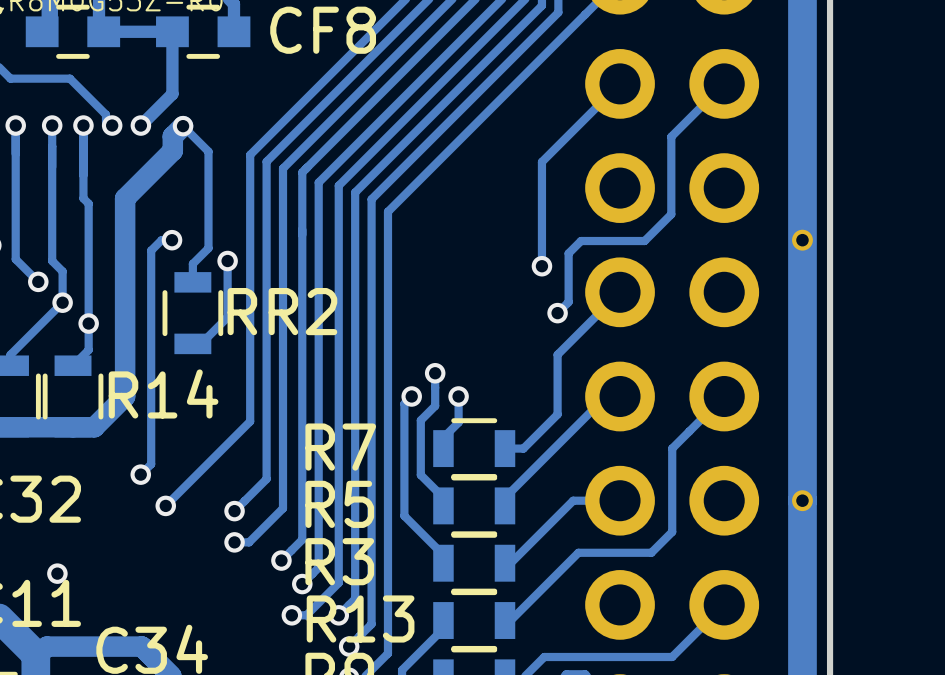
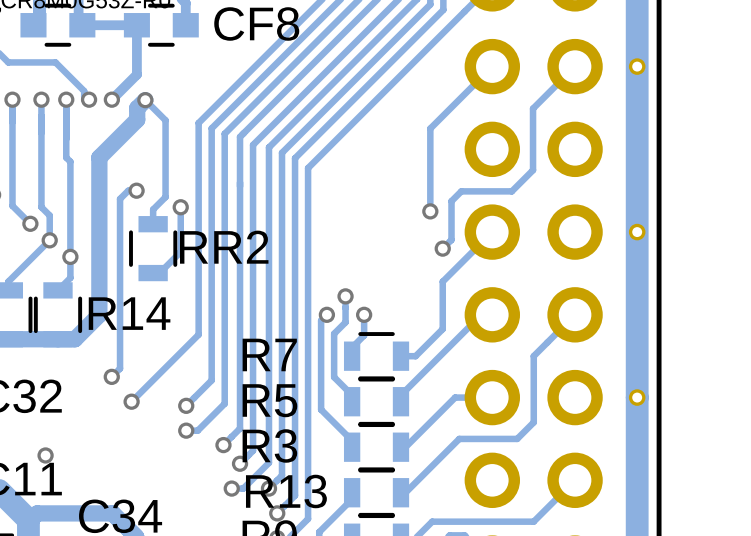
part: none -> (637, 66)
part position: (802, 240) -> (637, 232)

